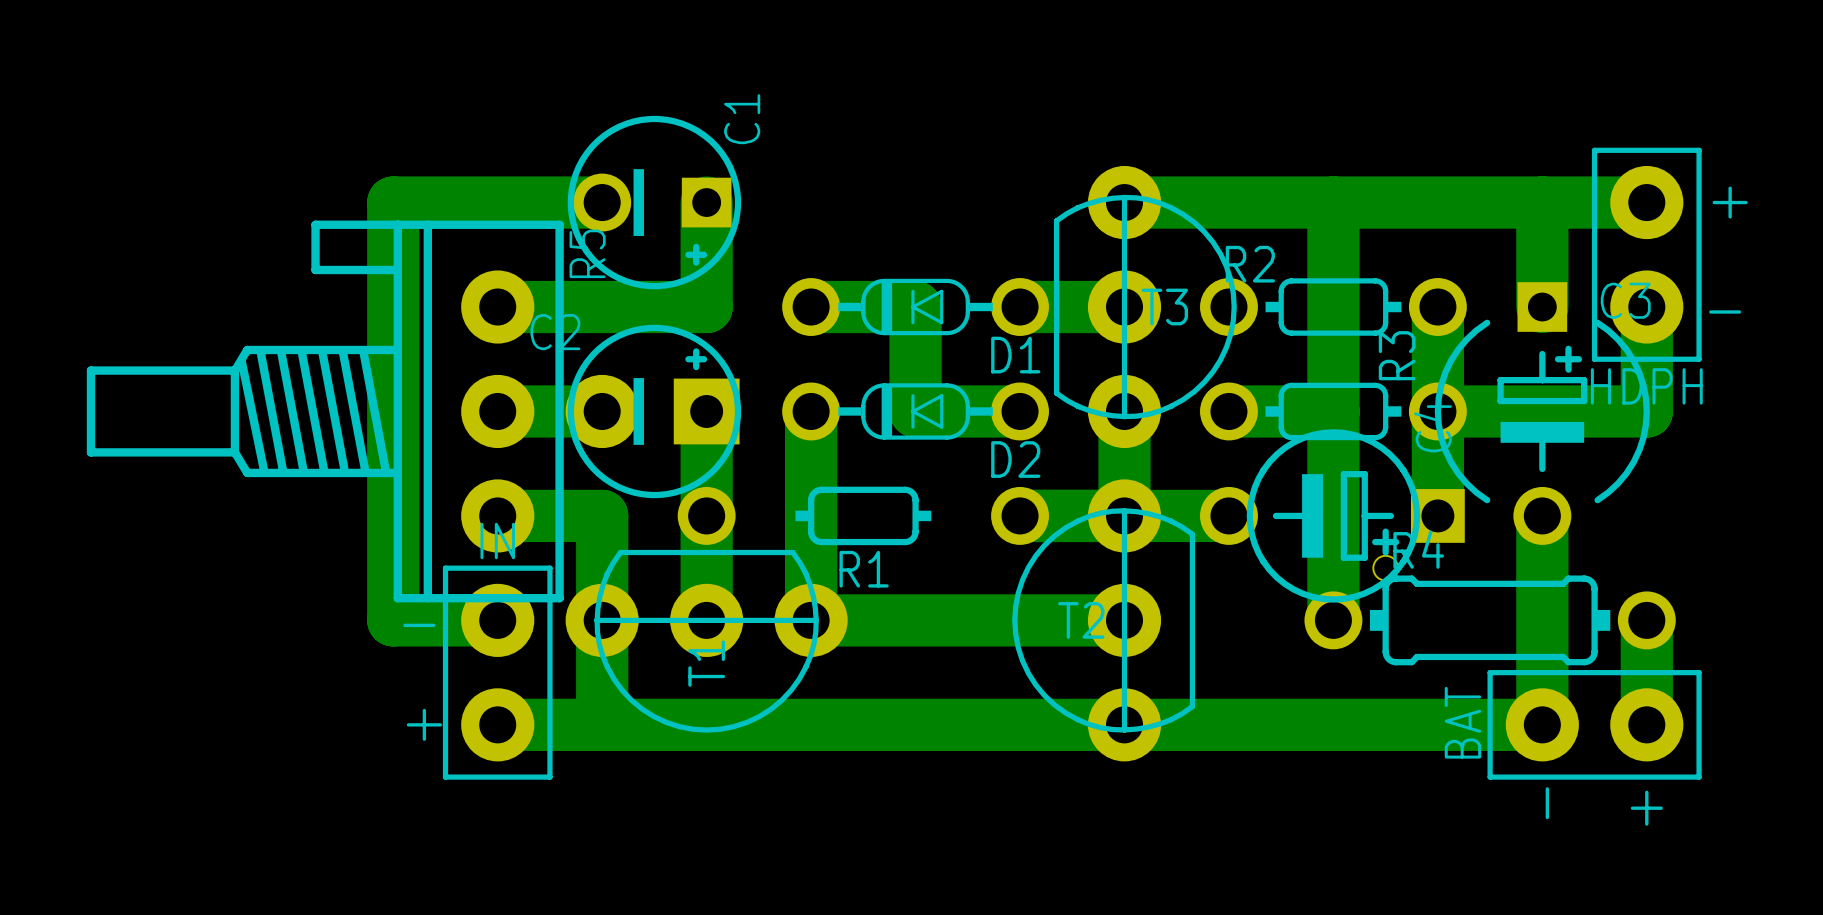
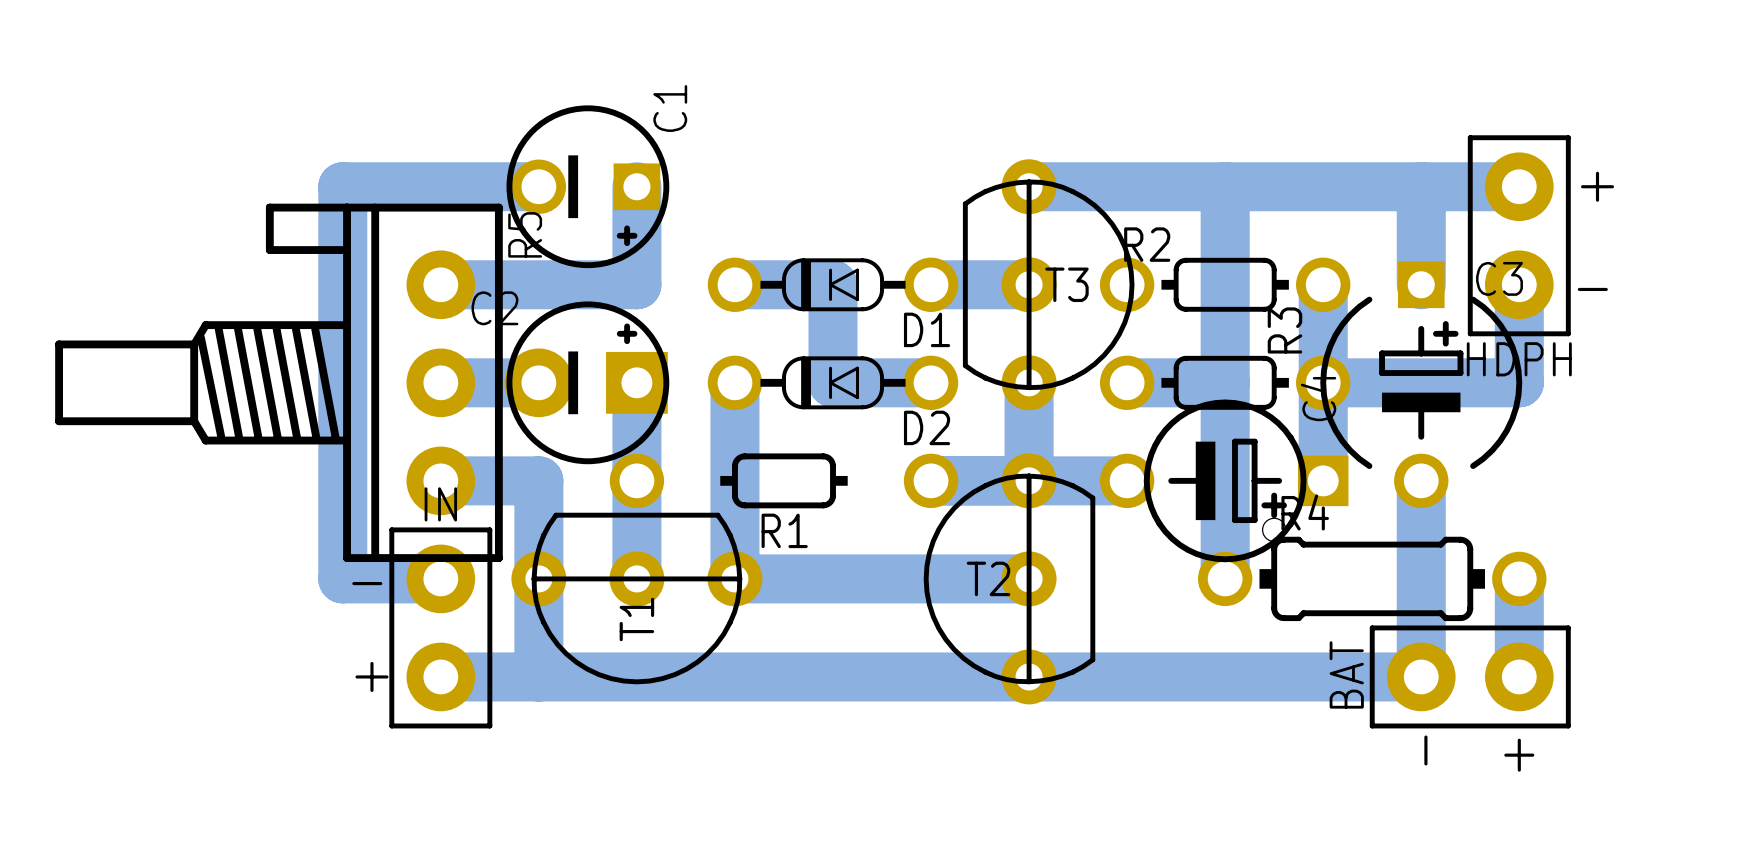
T3 footprint: [1053, 165, 1237, 449] -> [962, 159, 1135, 411]
T2 footprint: [1012, 479, 1196, 762] -> [923, 453, 1096, 705]
T1 footprint: [565, 549, 848, 733] -> [511, 512, 763, 685]

